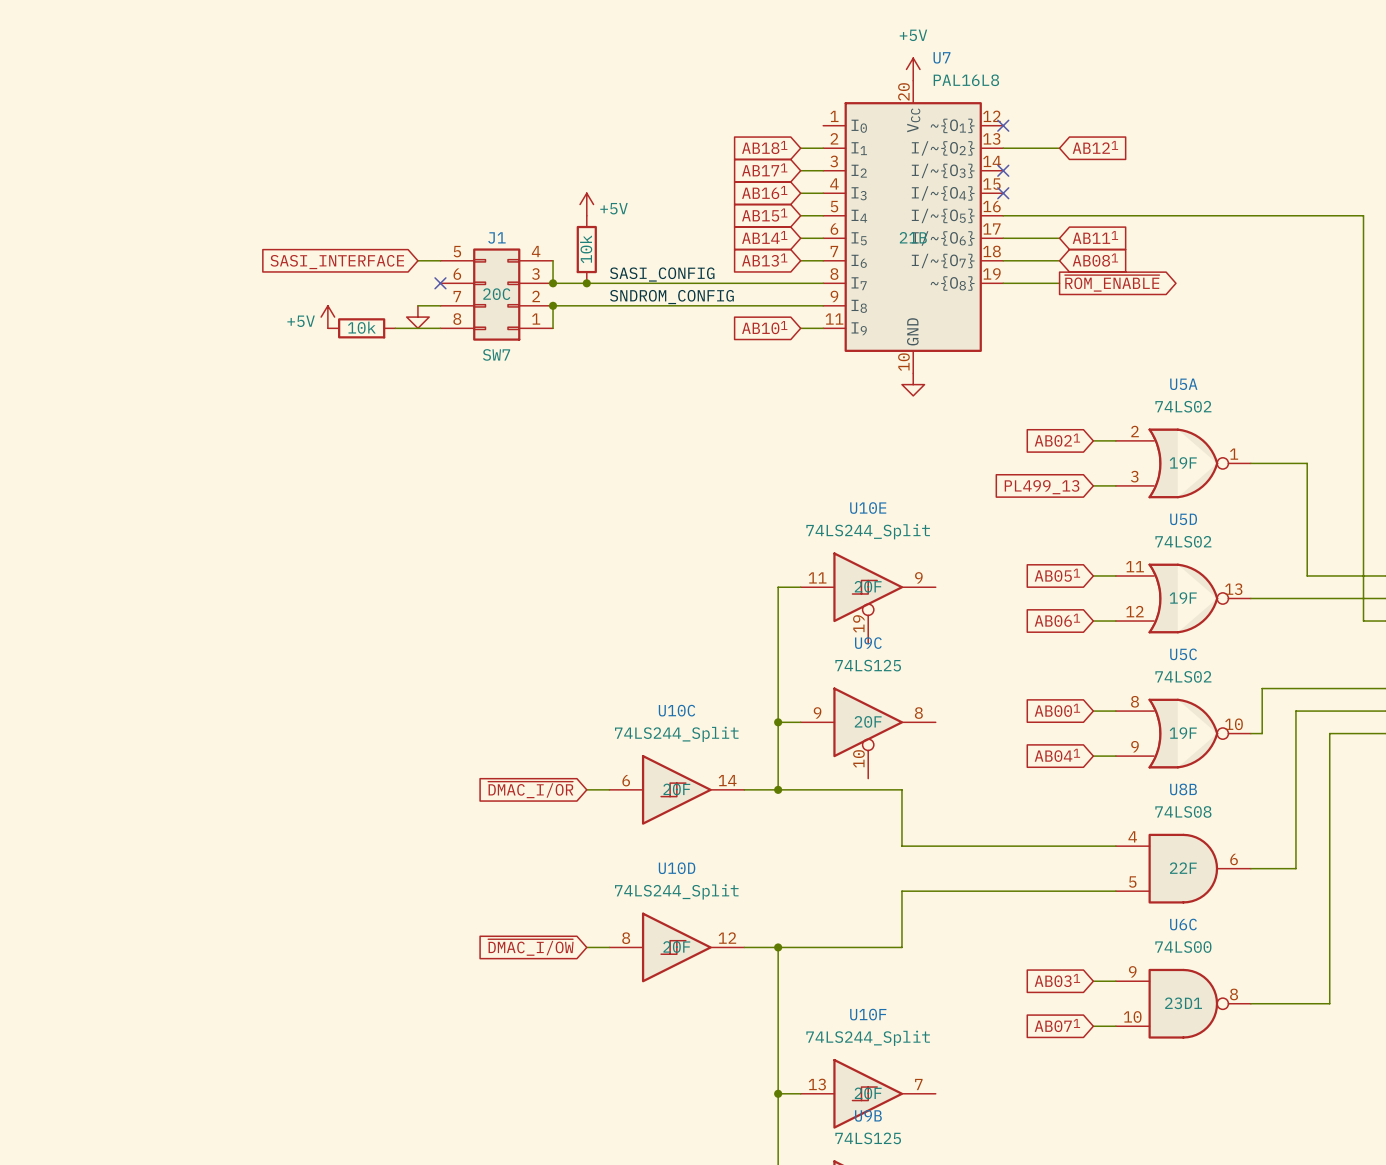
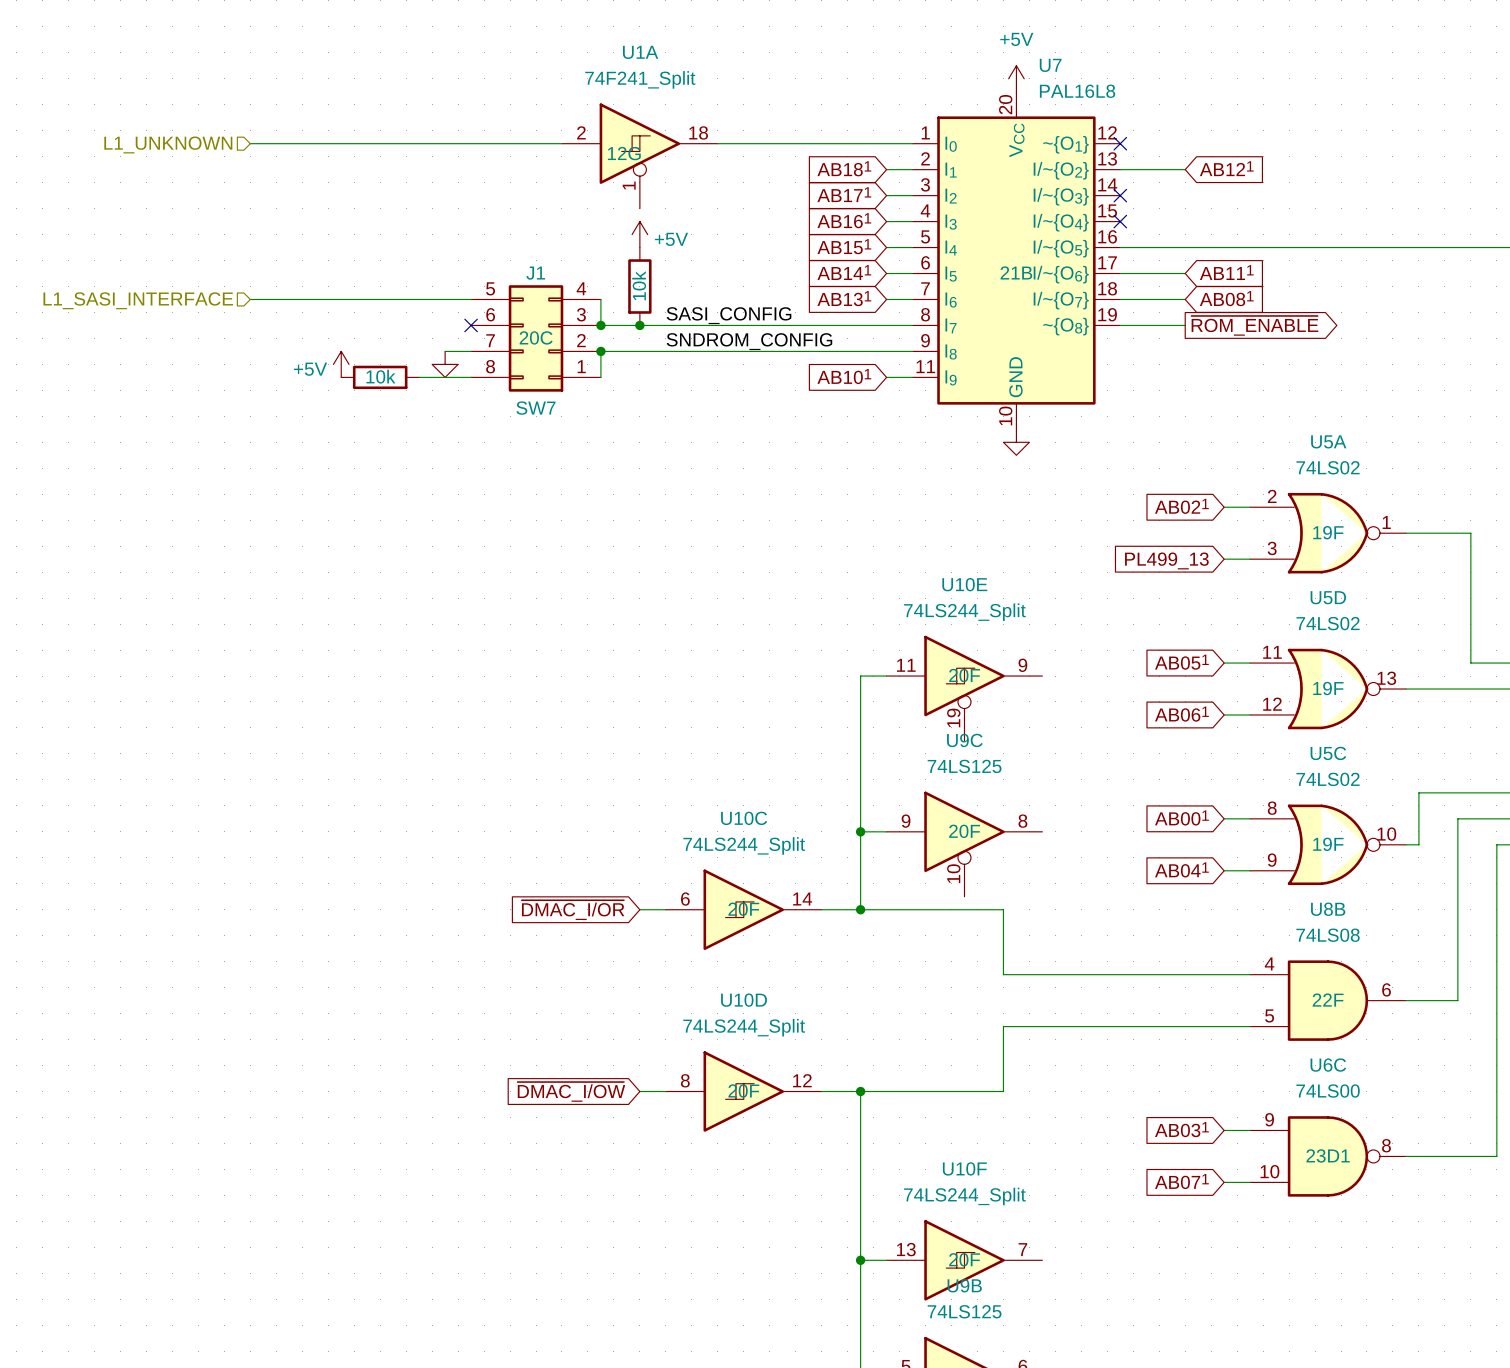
wire: none -> (250, 143) (561, 143)
wire: none -> (717, 143) (912, 143)
hierarchical label: none -> L1_UNKNOWN (168, 144)
U1A: none -> 74F241_Split (639, 156)
wire: none -> (250, 299) (445, 299)
hierarchical label: none -> L1_SASI_INTERFACE (138, 300)
global label: SASI_INTERFACE (337, 262) -> none

